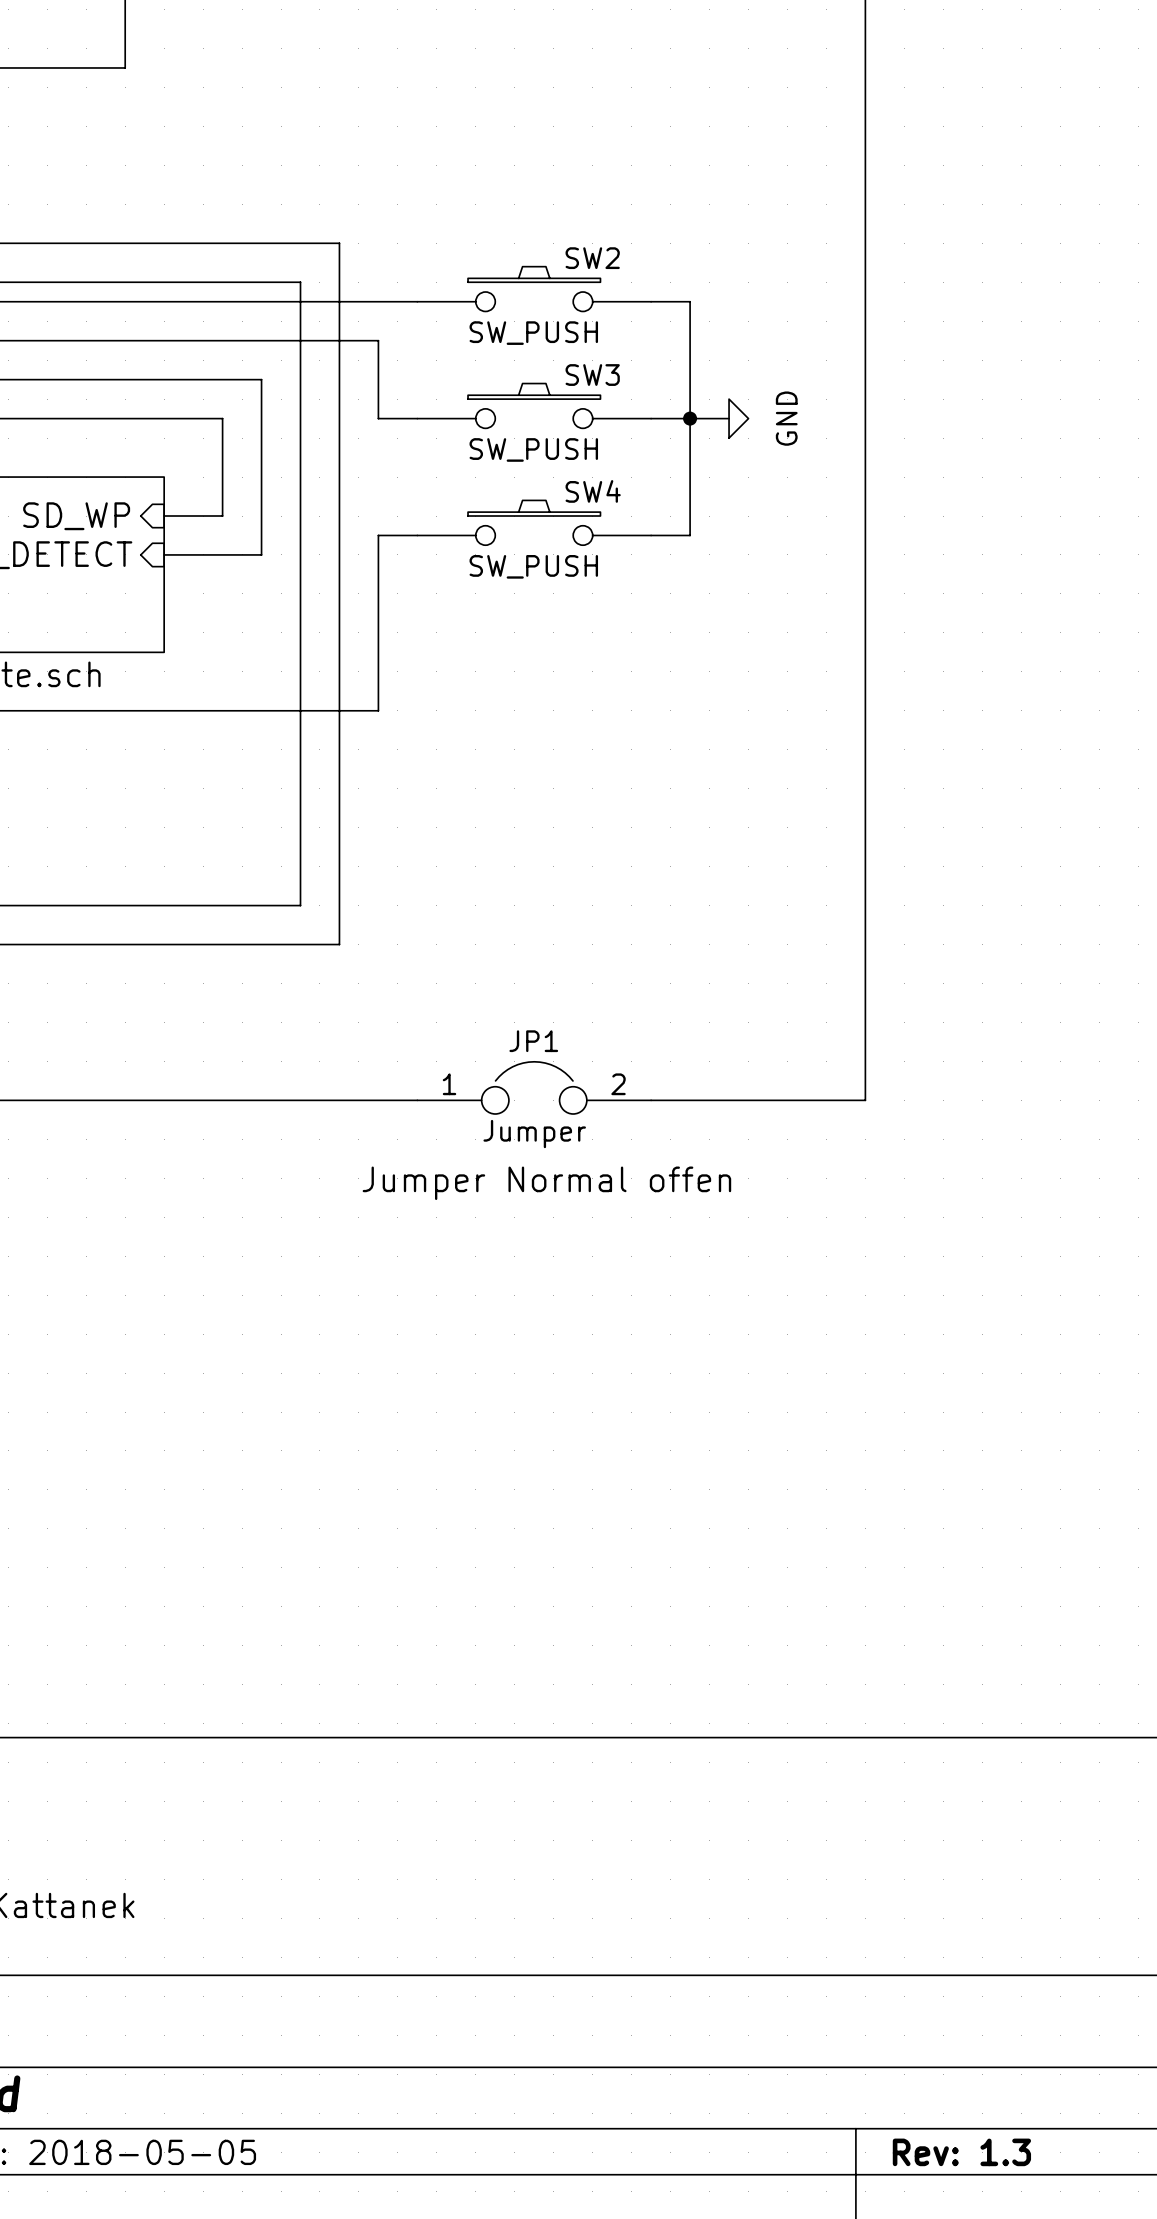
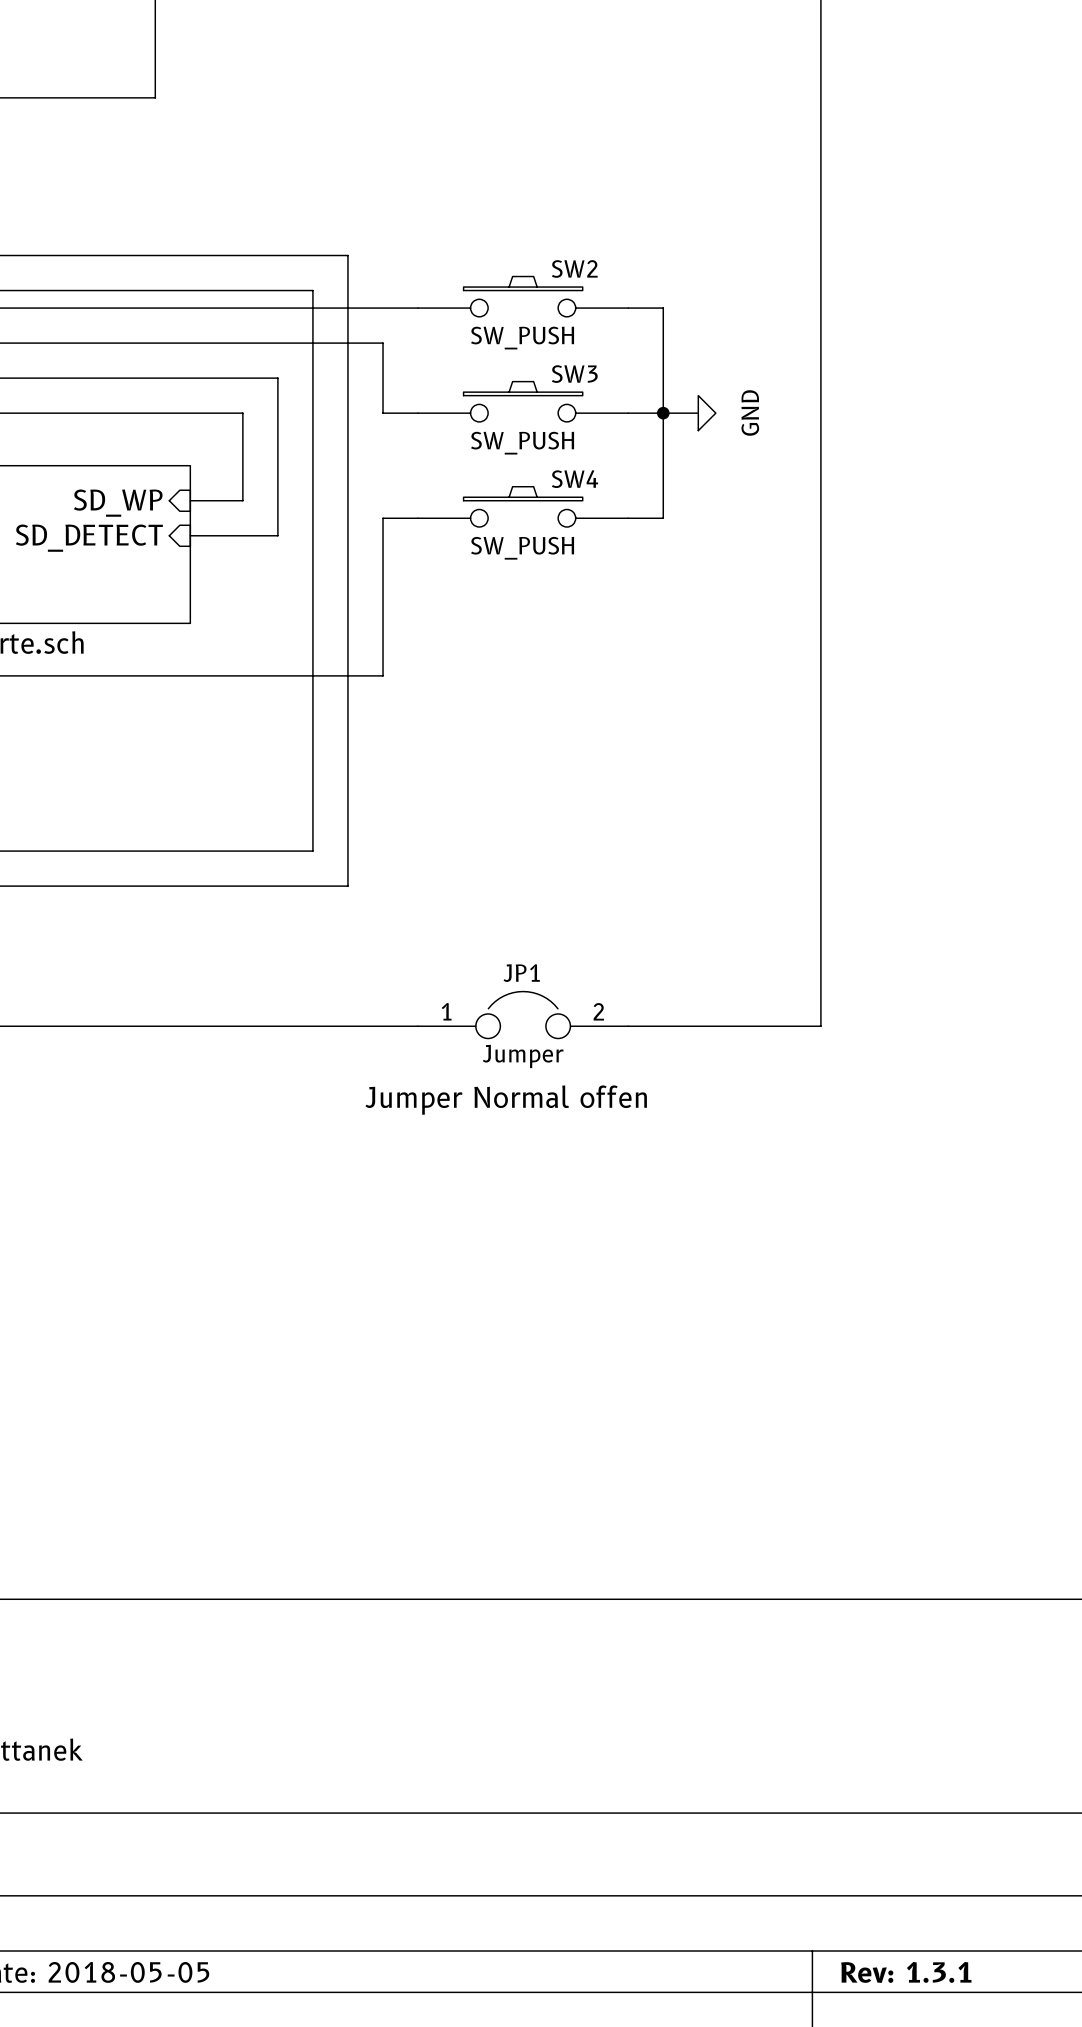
title block: Rev: 1.3 (961, 2152) -> Rev: 1.3.1 (906, 1972)

